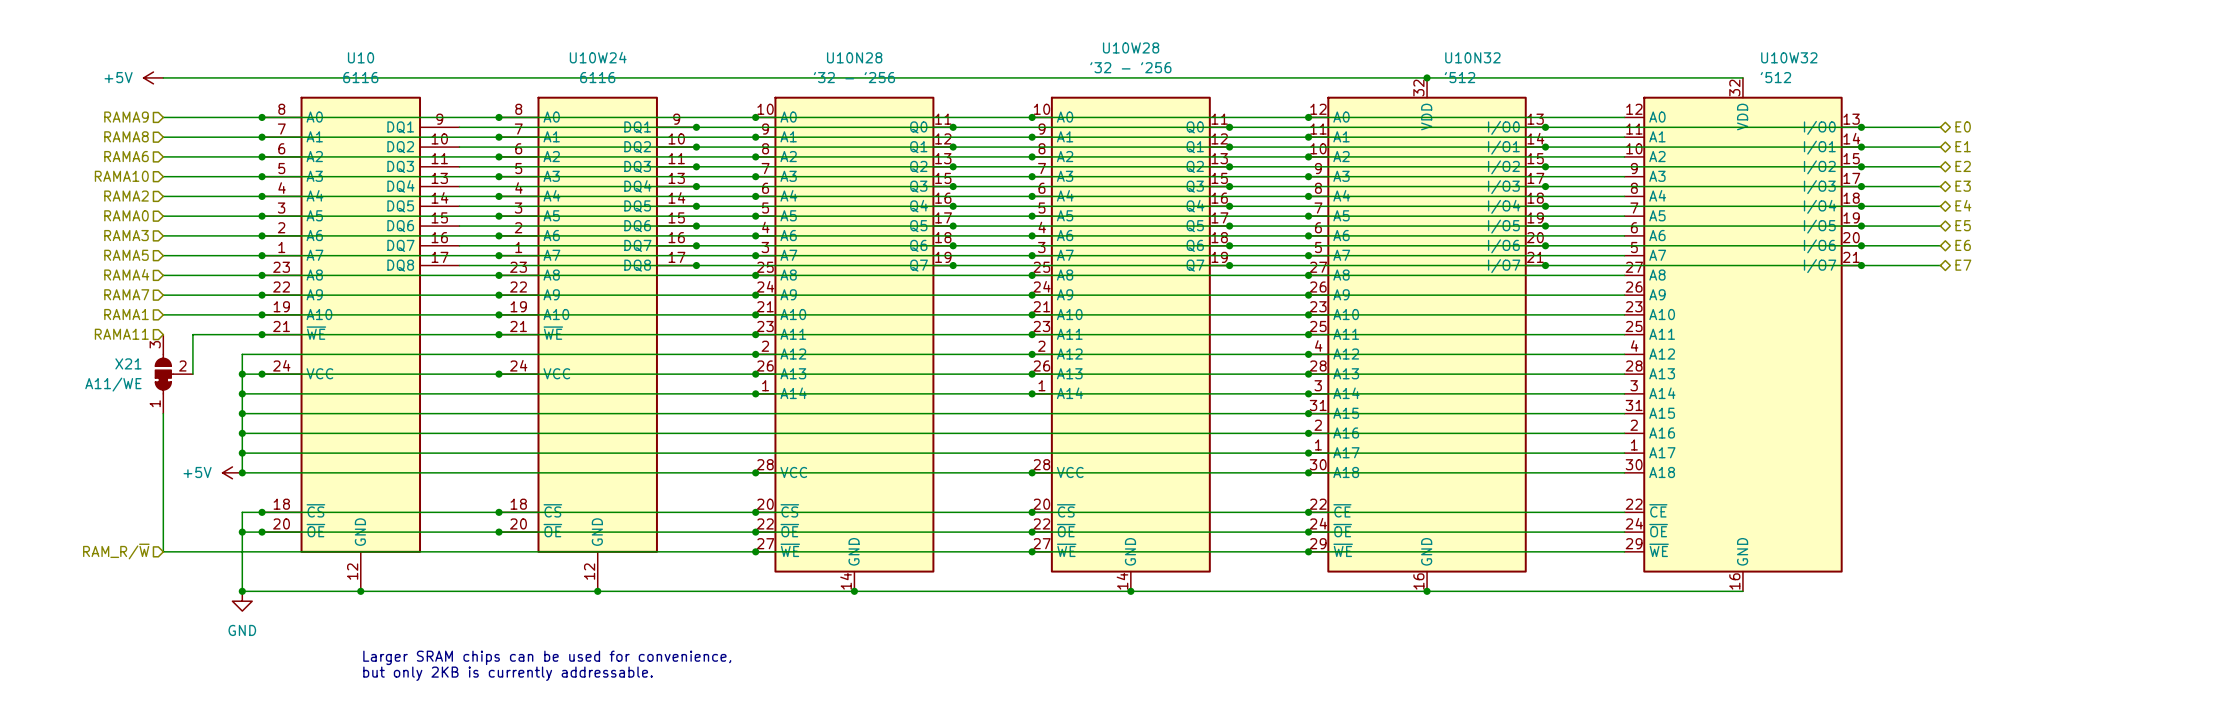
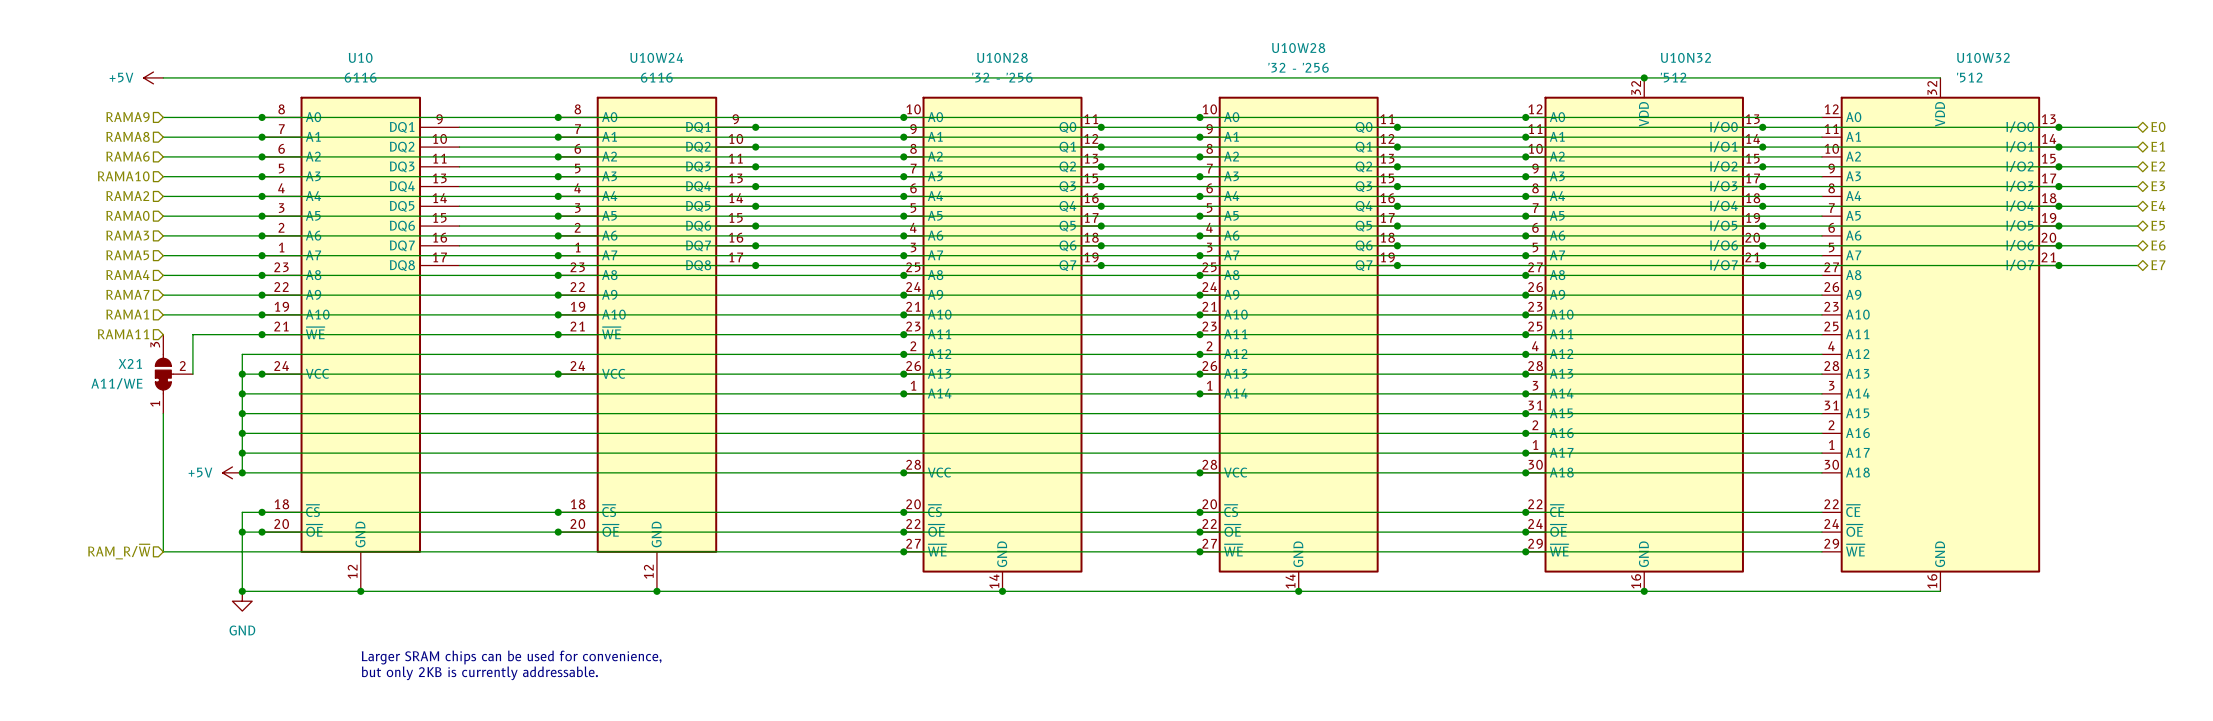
junction: (1427, 77) -> none
junction: none -> (1644, 77)
wire: none -> (1742, 77) (1940, 77)
junction: (499, 117) -> none
junction: none -> (558, 117)
junction: (755, 117) -> none
junction: none -> (903, 117)
junction: (1032, 117) -> none
junction: none -> (1199, 117)
junction: (1308, 117) -> none
junction: none -> (1525, 117)
hierarchical label: E0 (1963, 126) -> none
hierarchical label: none -> E0 (2158, 127)
junction: (696, 127) -> none
junction: none -> (755, 127)
junction: (953, 127) -> none
junction: none -> (1101, 127)
junction: (1229, 127) -> none
junction: none -> (1397, 127)
junction: (1545, 127) -> none
junction: none -> (1762, 127)
junction: (1861, 127) -> none
wire: none -> (1940, 127) (2137, 127)
junction: none -> (2058, 127)
junction: (499, 137) -> none
junction: none -> (558, 137)
junction: (755, 137) -> none
junction: none -> (903, 137)
junction: (1032, 137) -> none
junction: none -> (1199, 137)
junction: (1308, 137) -> none
junction: none -> (1525, 137)
hierarchical label: E1 (1963, 146) -> none
hierarchical label: none -> E1 (2158, 146)
junction: (696, 147) -> none
junction: none -> (755, 147)
junction: (953, 147) -> none
junction: none -> (1101, 147)
junction: (1229, 147) -> none
junction: none -> (1397, 147)
junction: (1545, 147) -> none
junction: none -> (1762, 147)
junction: (1861, 147) -> none
wire: none -> (1940, 147) (2137, 147)
junction: none -> (2058, 147)
junction: (499, 156) -> none
junction: none -> (558, 156)
junction: (755, 156) -> none
junction: none -> (903, 156)
junction: (1032, 156) -> none
junction: none -> (1199, 156)
junction: (1308, 156) -> none
junction: none -> (1525, 156)
junction: (696, 166) -> none
junction: none -> (755, 166)
junction: (953, 166) -> none
junction: none -> (1101, 166)
junction: (1229, 166) -> none
junction: none -> (1397, 166)
junction: (1545, 166) -> none
junction: none -> (1762, 166)
junction: (1861, 166) -> none
wire: none -> (1940, 166) (2137, 166)
hierarchical label: E2 (1963, 166) -> none
junction: none -> (2058, 166)
hierarchical label: none -> E2 (2158, 166)
junction: (499, 176) -> none
junction: none -> (558, 176)
junction: (755, 176) -> none
junction: none -> (903, 176)
junction: (1032, 176) -> none
junction: none -> (1199, 176)
junction: (1308, 176) -> none
junction: none -> (1525, 176)
junction: (696, 186) -> none
junction: none -> (755, 186)
junction: (953, 186) -> none
junction: none -> (1101, 186)
junction: (1229, 186) -> none
junction: none -> (1397, 186)
junction: (1545, 186) -> none
junction: none -> (1762, 186)
junction: (1861, 186) -> none
wire: none -> (1940, 186) (2137, 186)
hierarchical label: E3 (1963, 186) -> none
junction: none -> (2058, 186)
hierarchical label: none -> E3 (2158, 186)
junction: (499, 196) -> none
junction: none -> (558, 196)
junction: (755, 196) -> none
junction: none -> (903, 196)
junction: (1032, 196) -> none
junction: none -> (1199, 196)
junction: (1308, 196) -> none
junction: none -> (1525, 196)
hierarchical label: E4 (1963, 205) -> none
hierarchical label: none -> E4 (2158, 205)
junction: (696, 206) -> none
junction: none -> (755, 206)
junction: (953, 206) -> none
junction: none -> (1101, 206)
junction: (1229, 206) -> none
junction: none -> (1397, 206)
junction: (1545, 206) -> none
junction: none -> (1762, 206)
junction: (1861, 206) -> none
wire: none -> (1940, 206) (2137, 206)
junction: none -> (2058, 206)
junction: (499, 216) -> none
junction: none -> (558, 216)
junction: (755, 216) -> none
junction: none -> (903, 216)
junction: (1032, 216) -> none
junction: none -> (1199, 216)
junction: (1308, 216) -> none
junction: none -> (1525, 216)
hierarchical label: E5 (1963, 225) -> none
hierarchical label: none -> E5 (2158, 225)
junction: (696, 226) -> none
junction: none -> (755, 226)
junction: (953, 226) -> none
junction: none -> (1101, 226)
junction: (1229, 226) -> none
junction: none -> (1397, 226)
junction: (1545, 226) -> none
junction: none -> (1762, 226)
junction: (1861, 226) -> none
wire: none -> (1940, 226) (2137, 226)
junction: none -> (2058, 226)
junction: (499, 235) -> none
junction: none -> (558, 235)
junction: (755, 235) -> none
junction: none -> (903, 235)
junction: (1032, 235) -> none
junction: none -> (1199, 235)
junction: (1308, 235) -> none
junction: none -> (1525, 235)
junction: (696, 245) -> none
junction: none -> (755, 245)
junction: (953, 245) -> none
junction: none -> (1101, 245)
junction: (1229, 245) -> none
junction: none -> (1397, 245)
junction: (1545, 245) -> none
junction: none -> (1762, 245)
junction: (1861, 245) -> none
wire: none -> (1940, 245) (2137, 245)
hierarchical label: E6 (1963, 245) -> none
junction: none -> (2058, 245)
hierarchical label: none -> E6 (2158, 245)
junction: (499, 255) -> none
junction: none -> (558, 255)
junction: (755, 255) -> none
junction: none -> (903, 255)
junction: (1032, 255) -> none
junction: none -> (1199, 255)
junction: (1308, 255) -> none
junction: none -> (1525, 255)
junction: (696, 265) -> none
junction: none -> (755, 265)
junction: (953, 265) -> none
junction: none -> (1101, 265)
junction: (1229, 265) -> none
junction: none -> (1397, 265)
junction: (1545, 265) -> none
junction: none -> (1762, 265)
junction: (1861, 265) -> none
wire: none -> (1940, 265) (2137, 265)
hierarchical label: E7 (1963, 265) -> none
junction: none -> (2058, 265)
hierarchical label: none -> E7 (2158, 265)
junction: (499, 275) -> none
junction: none -> (558, 275)
junction: (755, 275) -> none
junction: none -> (903, 275)
junction: (1032, 275) -> none
junction: none -> (1199, 275)
junction: (1308, 275) -> none
junction: none -> (1525, 275)
junction: (499, 295) -> none
junction: none -> (558, 295)
junction: (755, 295) -> none
junction: none -> (903, 295)
junction: (1032, 295) -> none
junction: none -> (1199, 295)
junction: (1308, 295) -> none
junction: none -> (1525, 295)
junction: (499, 314) -> none
junction: none -> (558, 314)
junction: (755, 314) -> none
junction: none -> (903, 314)
junction: (1032, 314) -> none
junction: none -> (1199, 314)
junction: (1308, 314) -> none
junction: none -> (1525, 314)
junction: (499, 334) -> none
junction: none -> (558, 334)
junction: (755, 334) -> none
junction: none -> (903, 334)
junction: (1032, 334) -> none
junction: none -> (1199, 334)
junction: (1308, 334) -> none
U10N32 position: (1427, 334) -> (1644, 334)
junction: none -> (1525, 334)
U10W32 position: (1742, 334) -> (1940, 334)
U10W24 position: (597, 344) -> (656, 344)
U10N28 position: (854, 344) -> (1002, 344)
U10W28 position: (1130, 344) -> (1298, 344)
junction: (755, 354) -> none
junction: none -> (903, 354)
junction: (1032, 354) -> none
junction: none -> (1199, 354)
junction: (1308, 354) -> none
junction: none -> (1525, 354)
junction: (499, 374) -> none
junction: none -> (558, 374)
junction: (755, 374) -> none
junction: none -> (903, 374)
junction: (1032, 374) -> none
junction: none -> (1199, 374)
junction: (1308, 374) -> none
junction: none -> (1525, 374)
junction: (755, 393) -> none
junction: none -> (903, 393)
junction: (1032, 393) -> none
junction: none -> (1199, 393)
junction: (1308, 393) -> none
junction: none -> (1525, 393)
junction: (1308, 413) -> none
junction: none -> (1525, 413)
junction: (1308, 433) -> none
junction: none -> (1525, 433)
junction: (1308, 453) -> none
junction: none -> (1525, 453)
junction: (755, 472) -> none
junction: none -> (903, 472)
junction: (1032, 472) -> none
junction: none -> (1199, 472)
junction: (1308, 472) -> none
junction: none -> (1525, 472)
junction: (499, 512) -> none
junction: none -> (558, 512)
junction: (755, 512) -> none
junction: none -> (903, 512)
junction: (1032, 512) -> none
junction: none -> (1199, 512)
junction: (1308, 512) -> none
junction: none -> (1525, 512)
junction: (499, 532) -> none
junction: none -> (558, 532)
junction: (755, 532) -> none
junction: none -> (903, 532)
junction: (1032, 532) -> none
junction: none -> (1199, 532)
junction: (1308, 532) -> none
junction: none -> (1525, 532)
junction: (755, 551) -> none
junction: none -> (903, 551)
junction: (1032, 551) -> none
junction: none -> (1199, 551)
junction: (1308, 551) -> none
junction: none -> (1525, 551)
junction: (597, 591) -> none
junction: none -> (656, 591)
junction: (854, 591) -> none
junction: none -> (1002, 591)
junction: (1130, 591) -> none
junction: none -> (1298, 591)
junction: (1427, 591) -> none
junction: none -> (1644, 591)
wire: none -> (1742, 591) (1940, 591)

